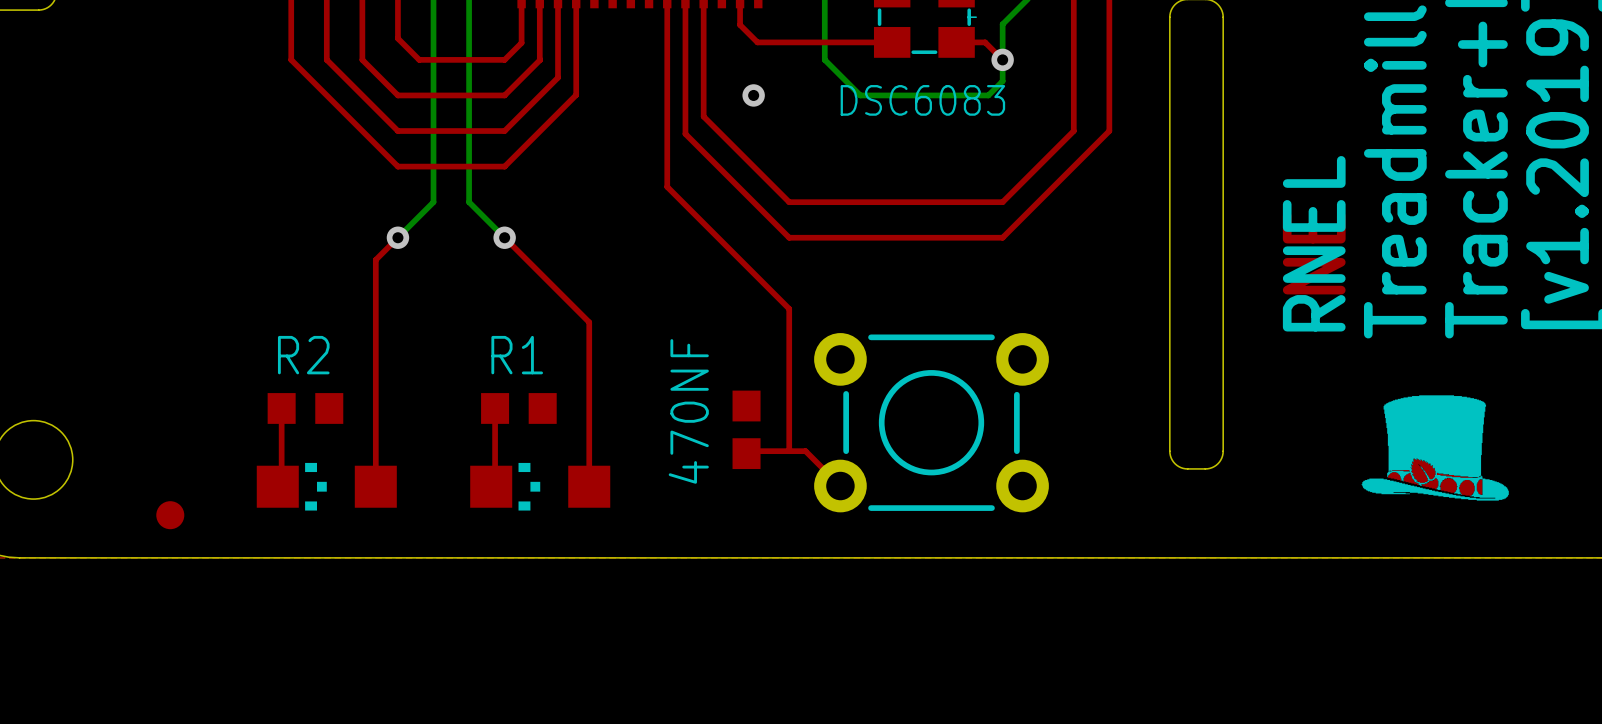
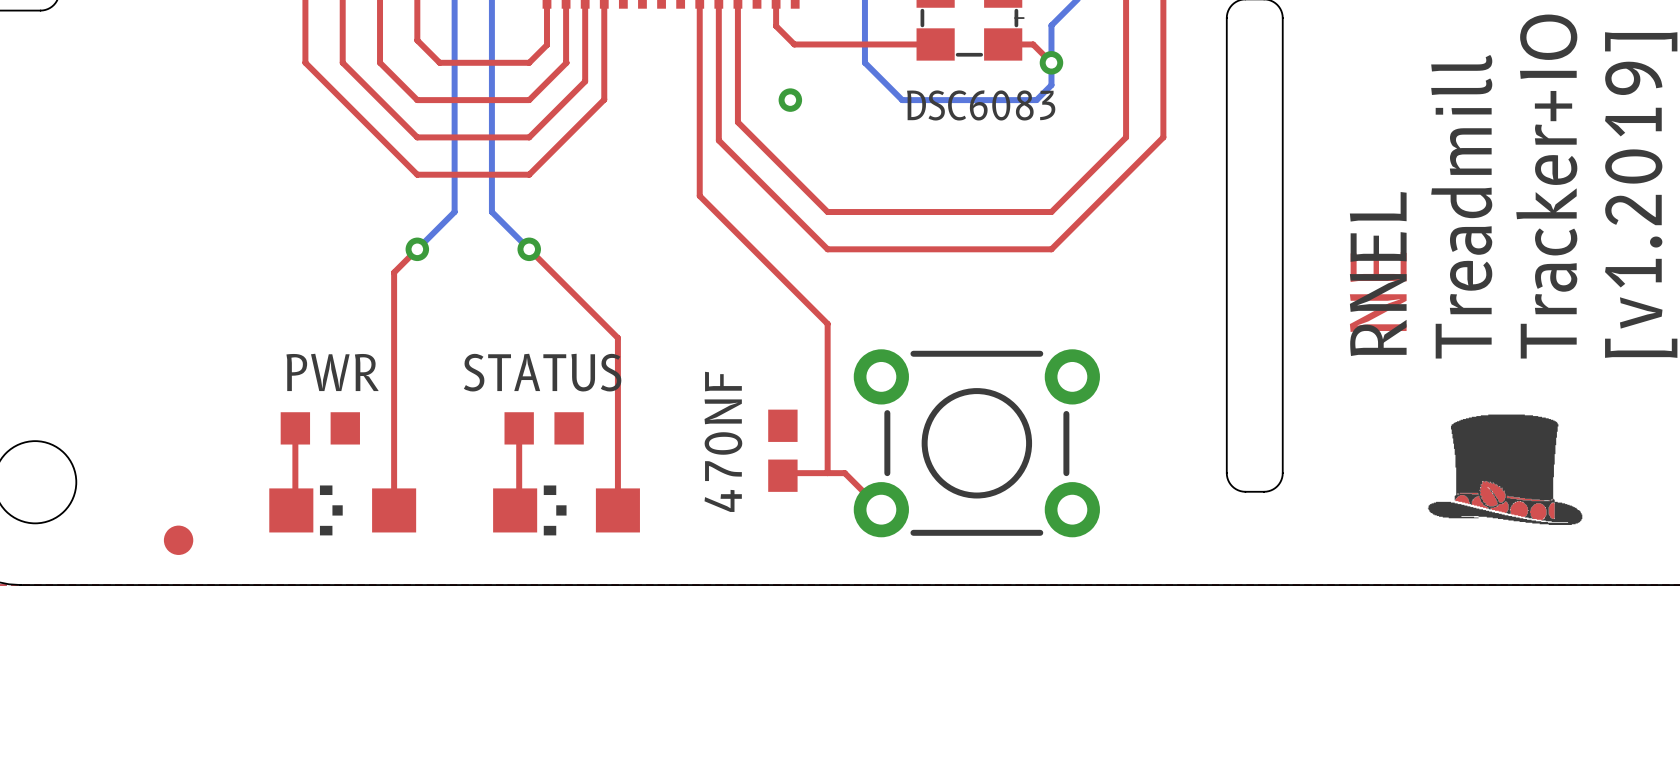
R2 name: R2 (303, 355) -> none
text: none -> PWR (332, 372)
R1 name: R1 (517, 355) -> none
text: none -> STATUS (542, 372)

